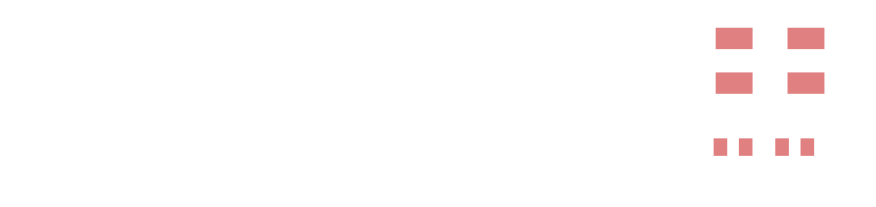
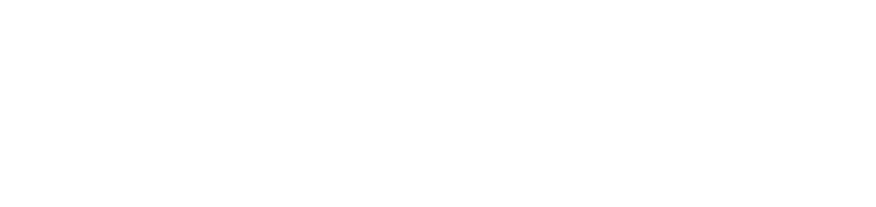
part: (770, 60) -> none
part: (733, 147) -> none
part: (794, 147) -> none

